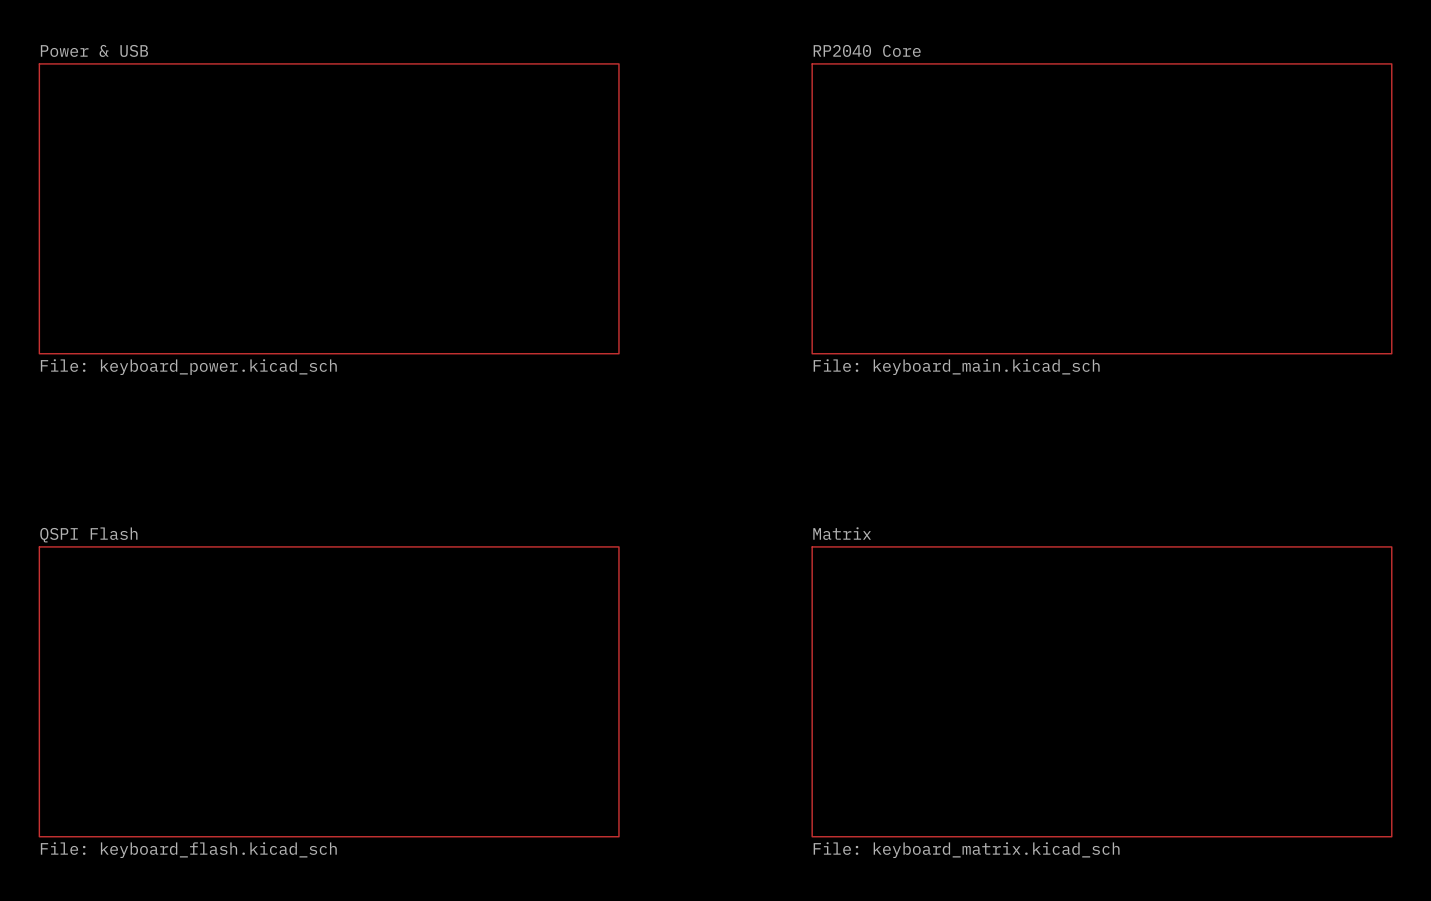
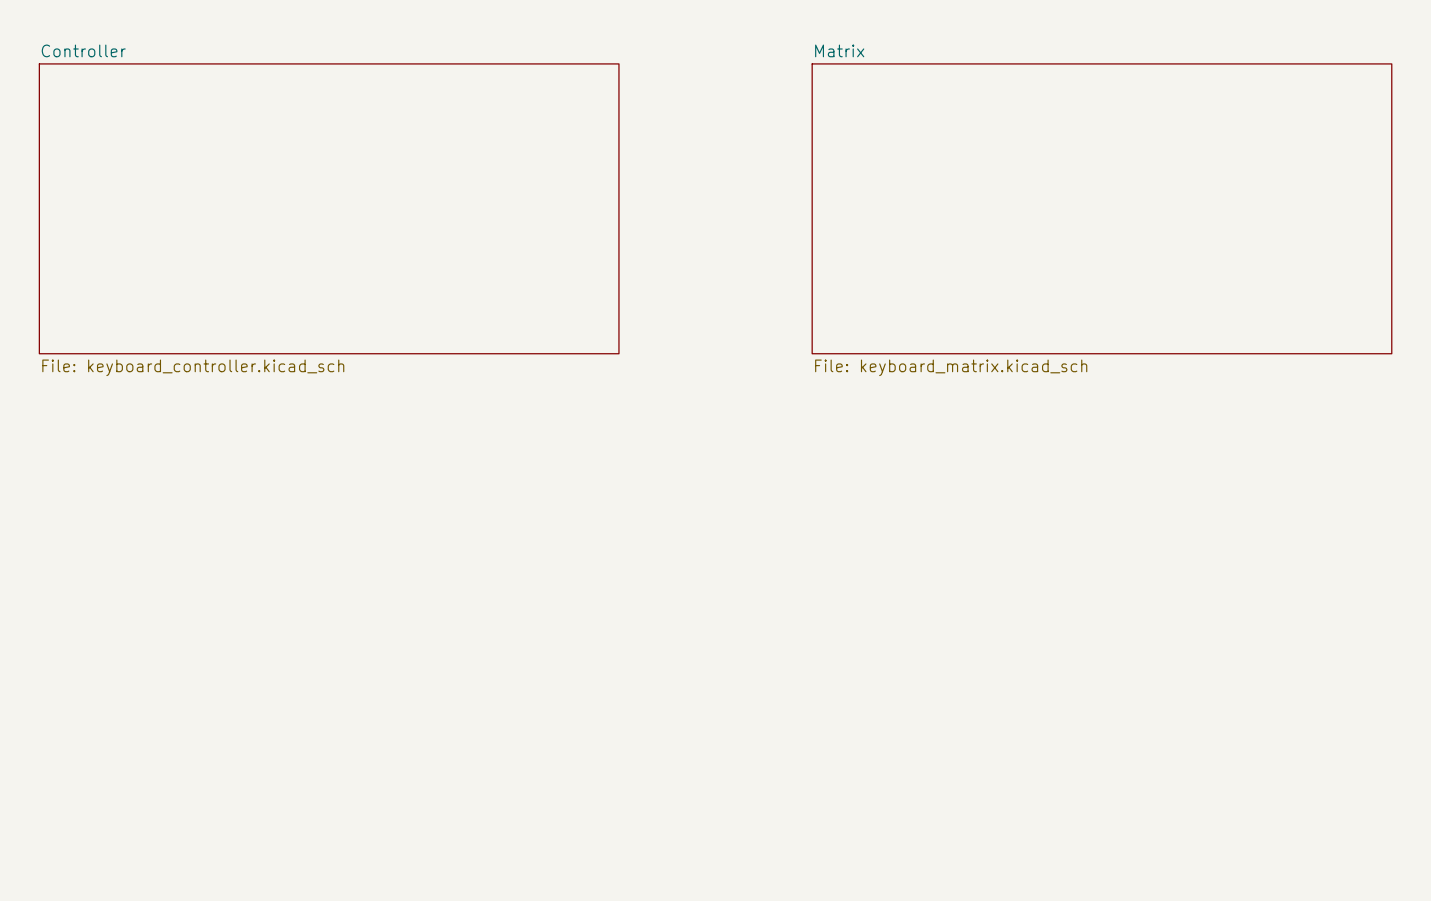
sheet Power & USB name: Power & USB (94, 50) -> Controller (83, 50)
sheet RP2040 Core name: RP2040 Core (867, 50) -> Matrix (839, 50)
sheet Power & USB value: File: keyboard_power.kicad_sch (188, 367) -> File: keyboard_controller.kicad_sch (193, 367)
sheet RP2040 Core value: File: keyboard_main.kicad_sch (956, 367) -> File: keyboard_matrix.kicad_sch (951, 367)
sheet QSPI Flash: File: keyboard_flash.kicad_sch (329, 691) -> none
sheet Matrix: File: keyboard_matrix.kicad_sch (1101, 691) -> none

